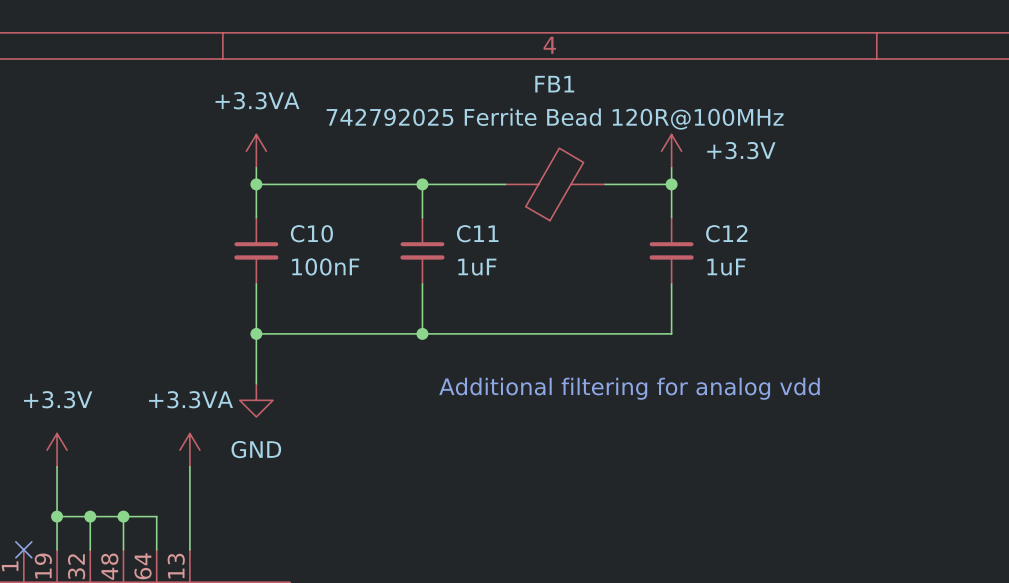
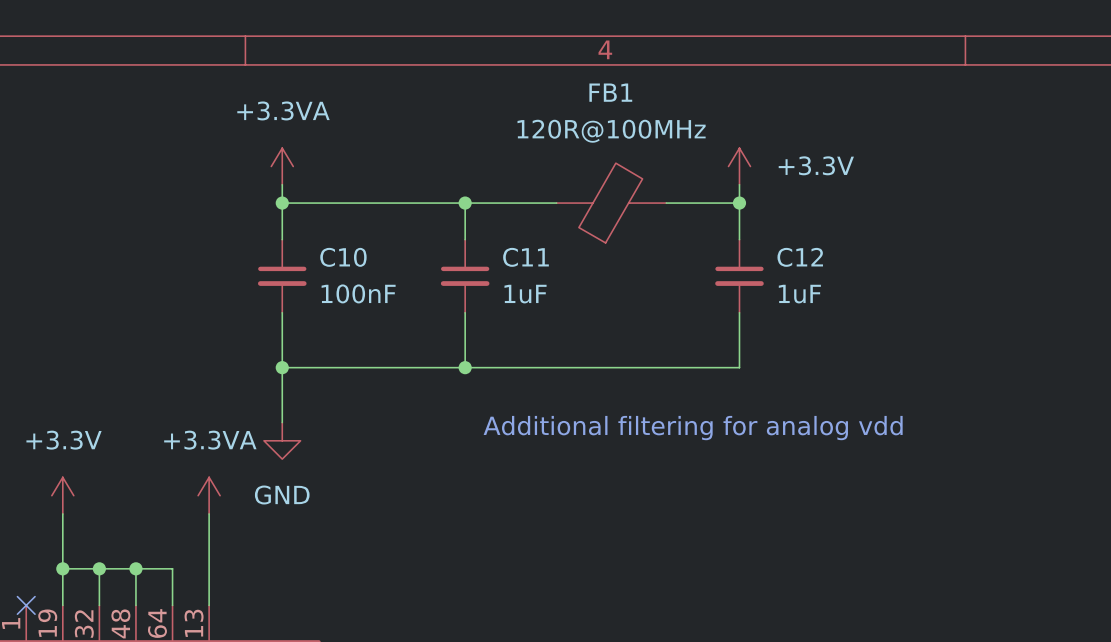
FB1 value: 742792025 Ferrite Bead 120R@100MHz (555, 118) -> 120R@100MHz (611, 131)

